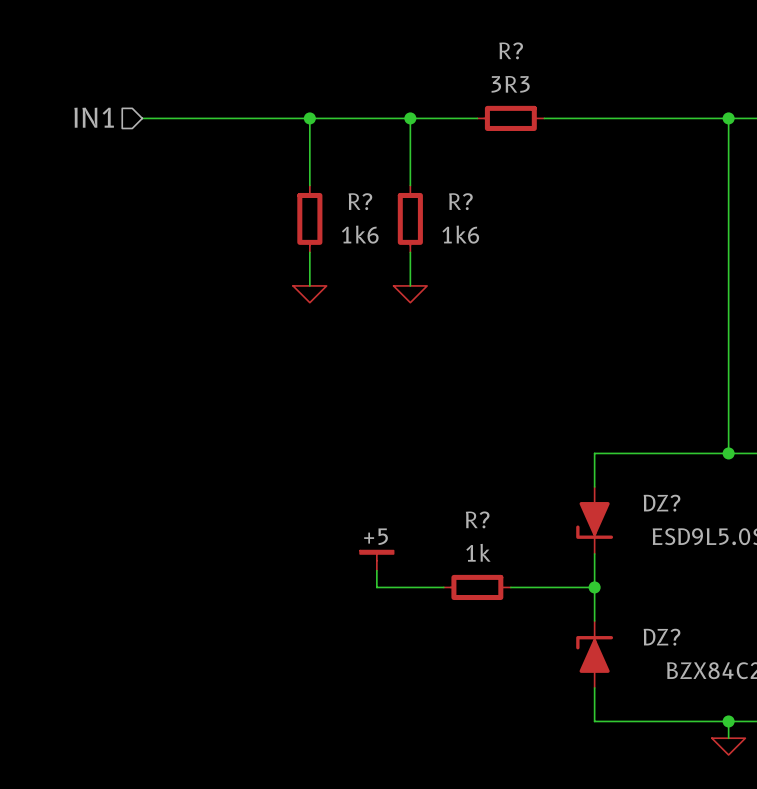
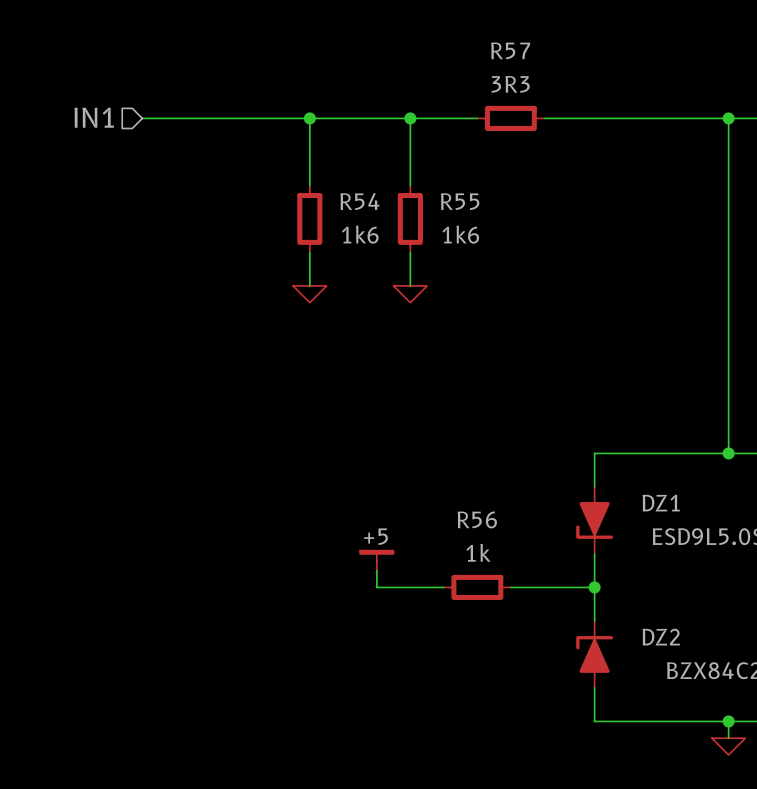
R? name: R? (511, 50) -> R57 (510, 50)
R? name: R? (360, 201) -> R54 (359, 201)
R? name: R? (460, 201) -> R55 (460, 201)
DZ? name: DZ? (662, 503) -> DZ1 (661, 503)
R? name: R? (477, 519) -> R56 (477, 519)
DZ? name: DZ? (662, 637) -> DZ2 (661, 637)

